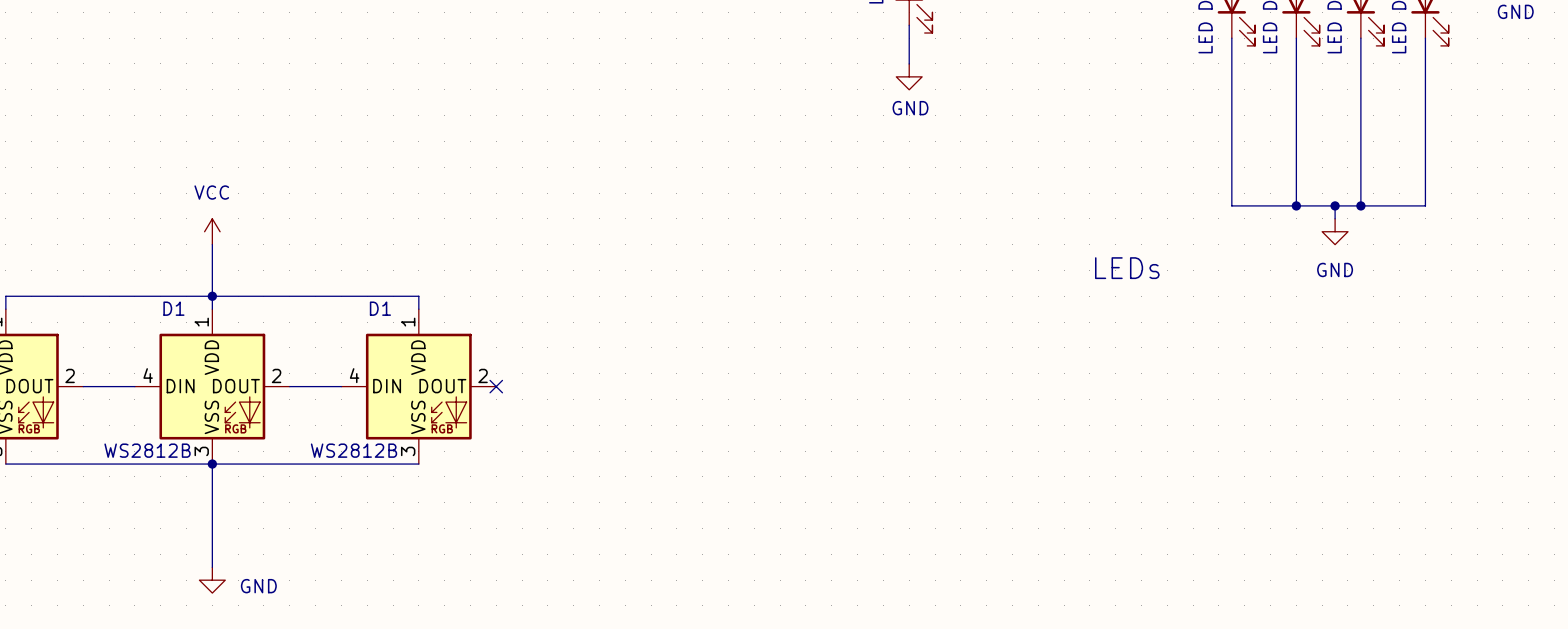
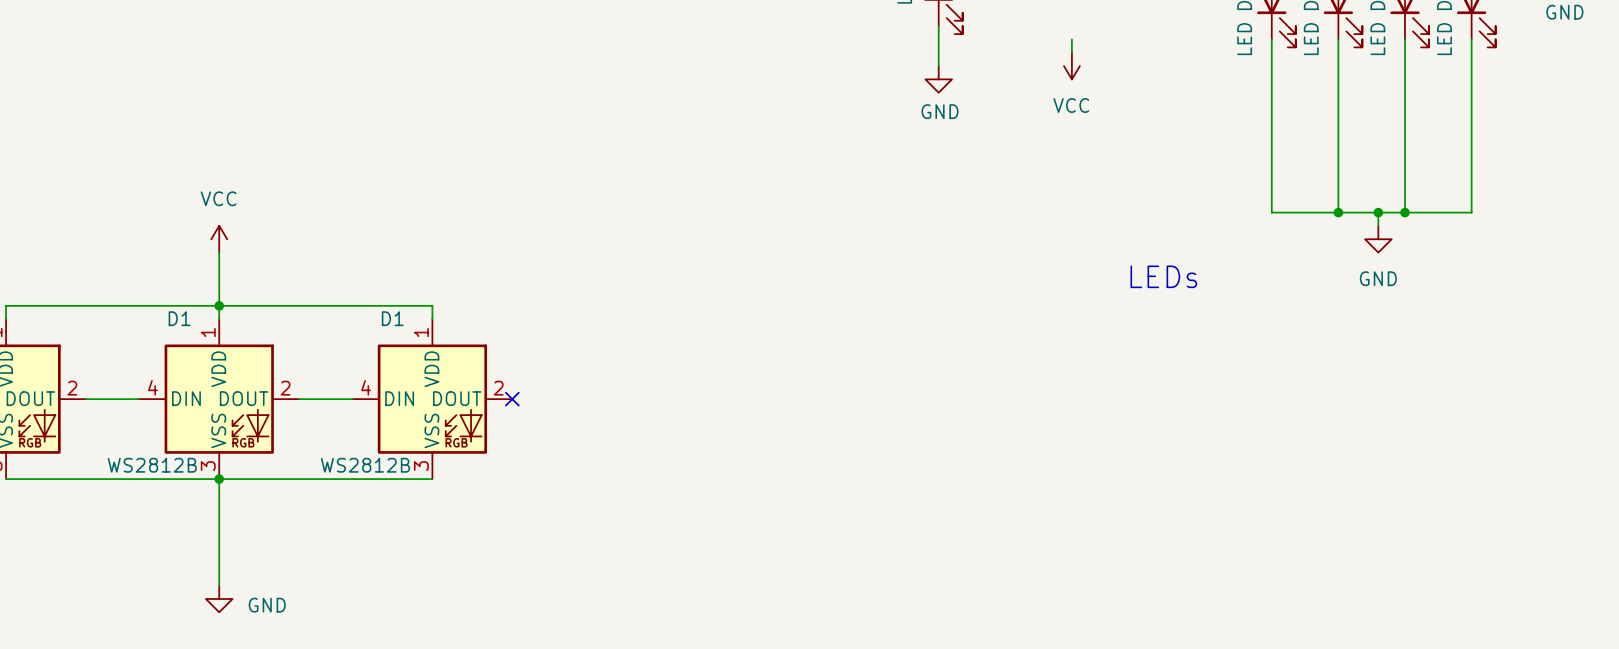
wire: none -> (1071, 39) (1071, 52)
power symbol: none -> VCC (1071, 66)

